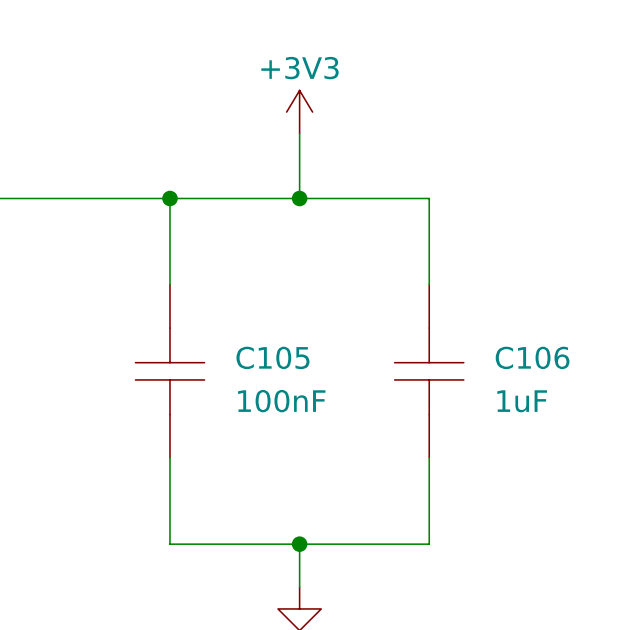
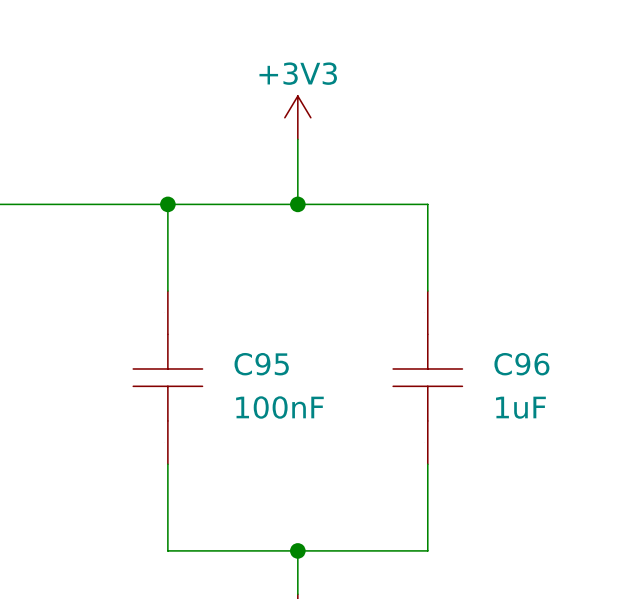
C105 name: C105 (272, 357) -> C95 (261, 364)
C106 name: C106 (532, 357) -> C96 (521, 364)

